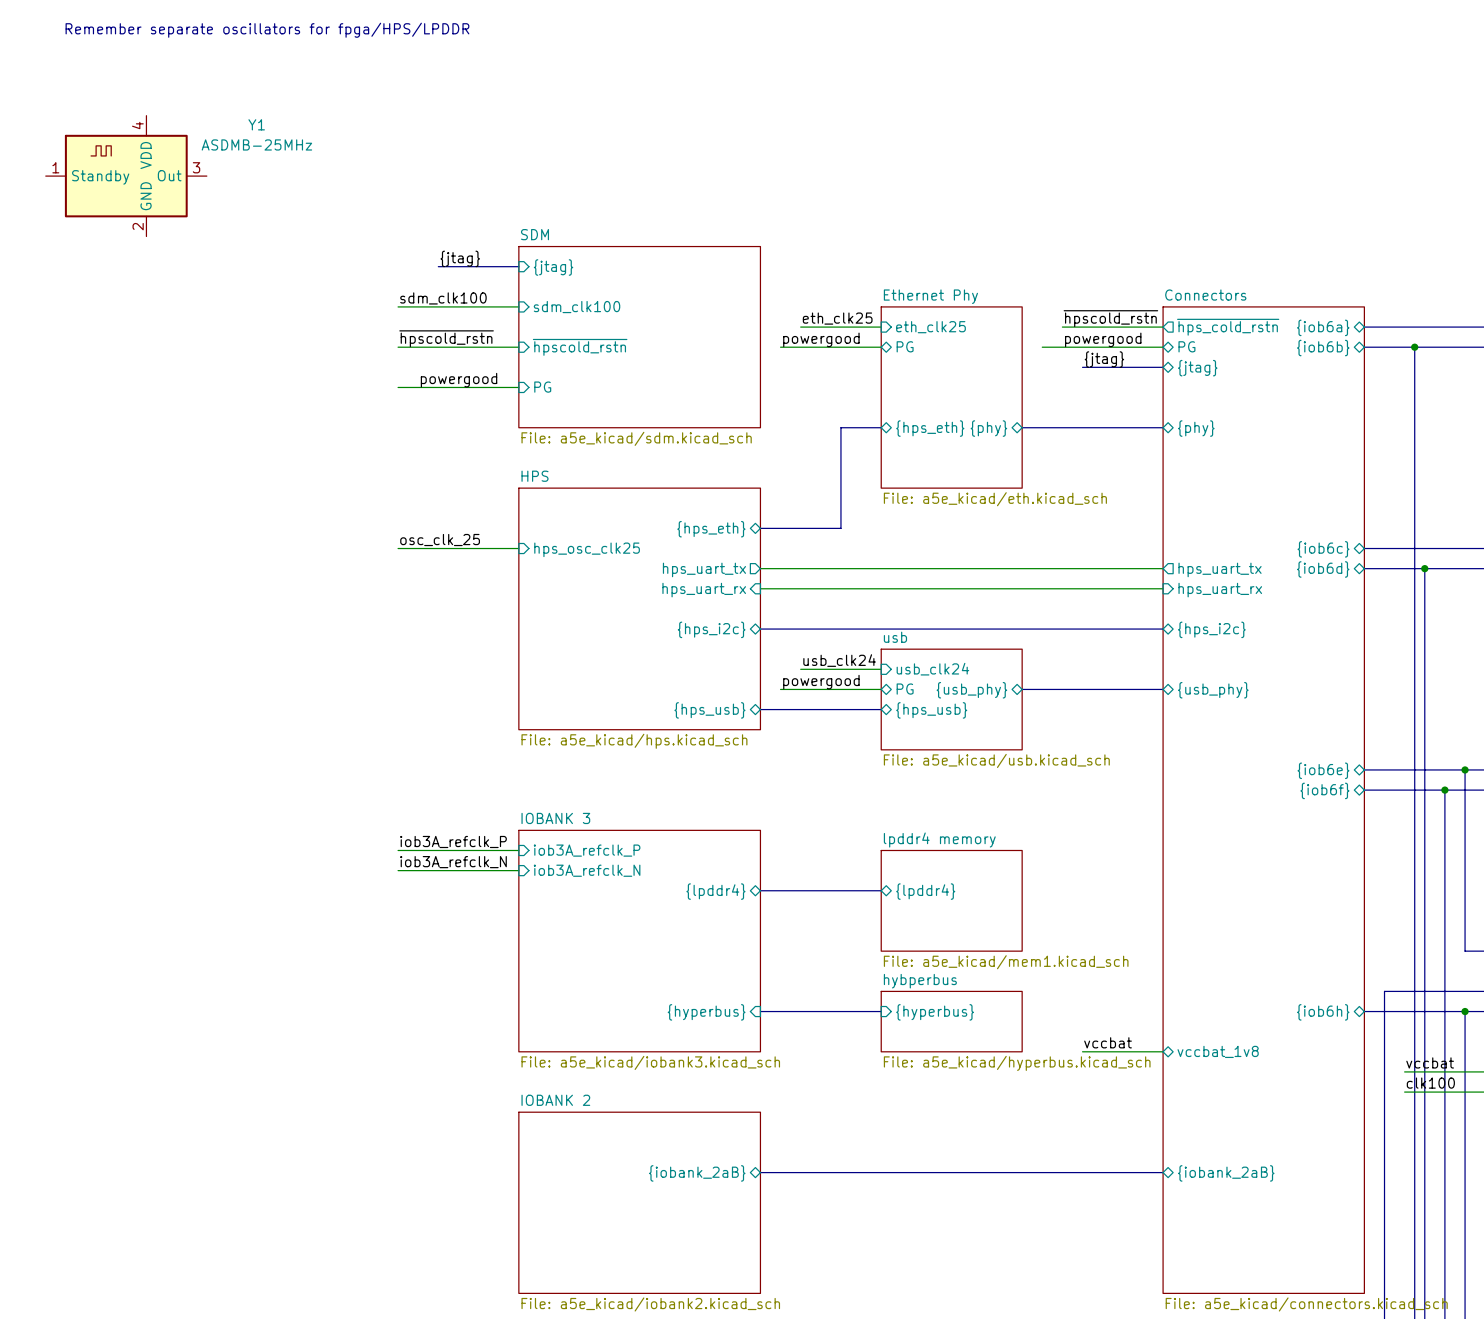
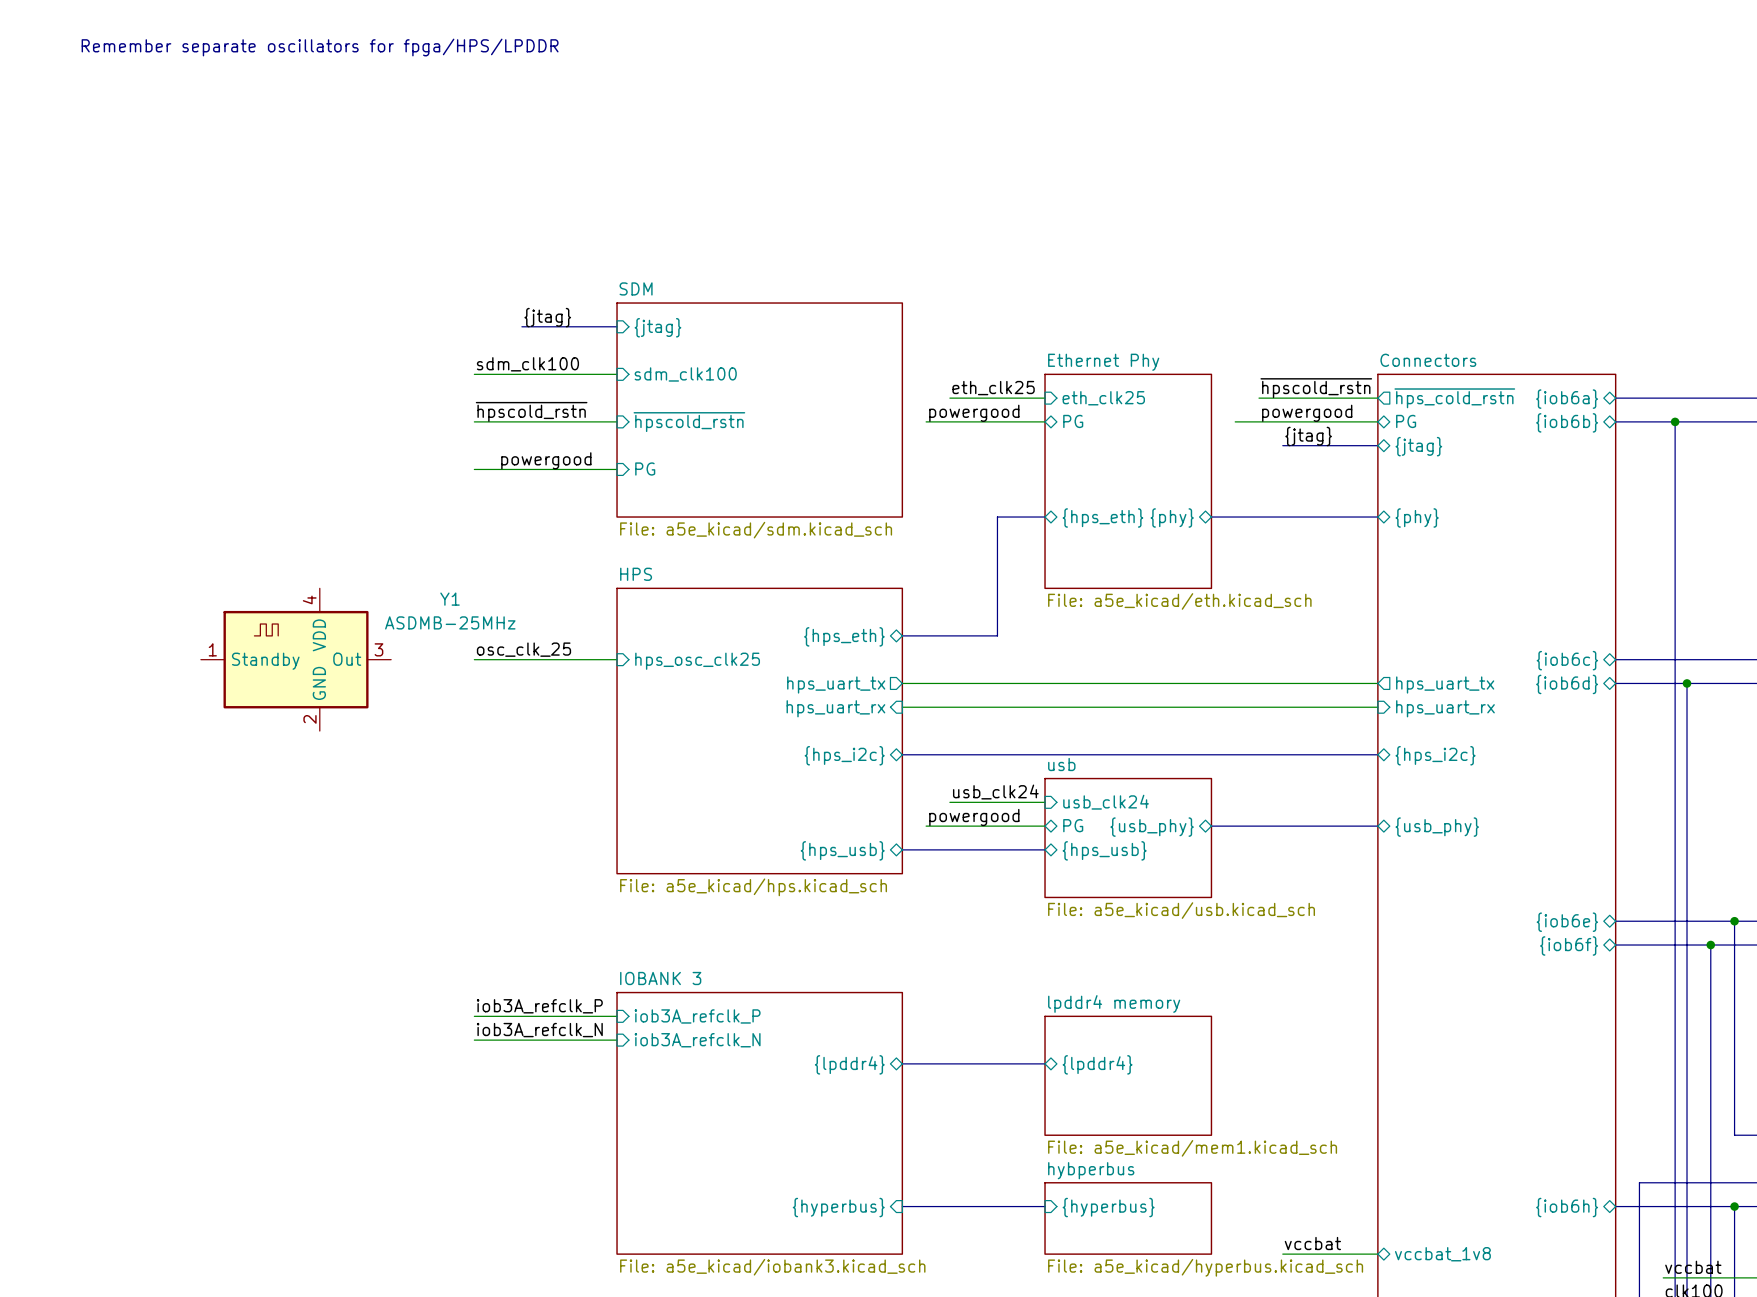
Y1 position: (126, 176) -> (296, 659)

